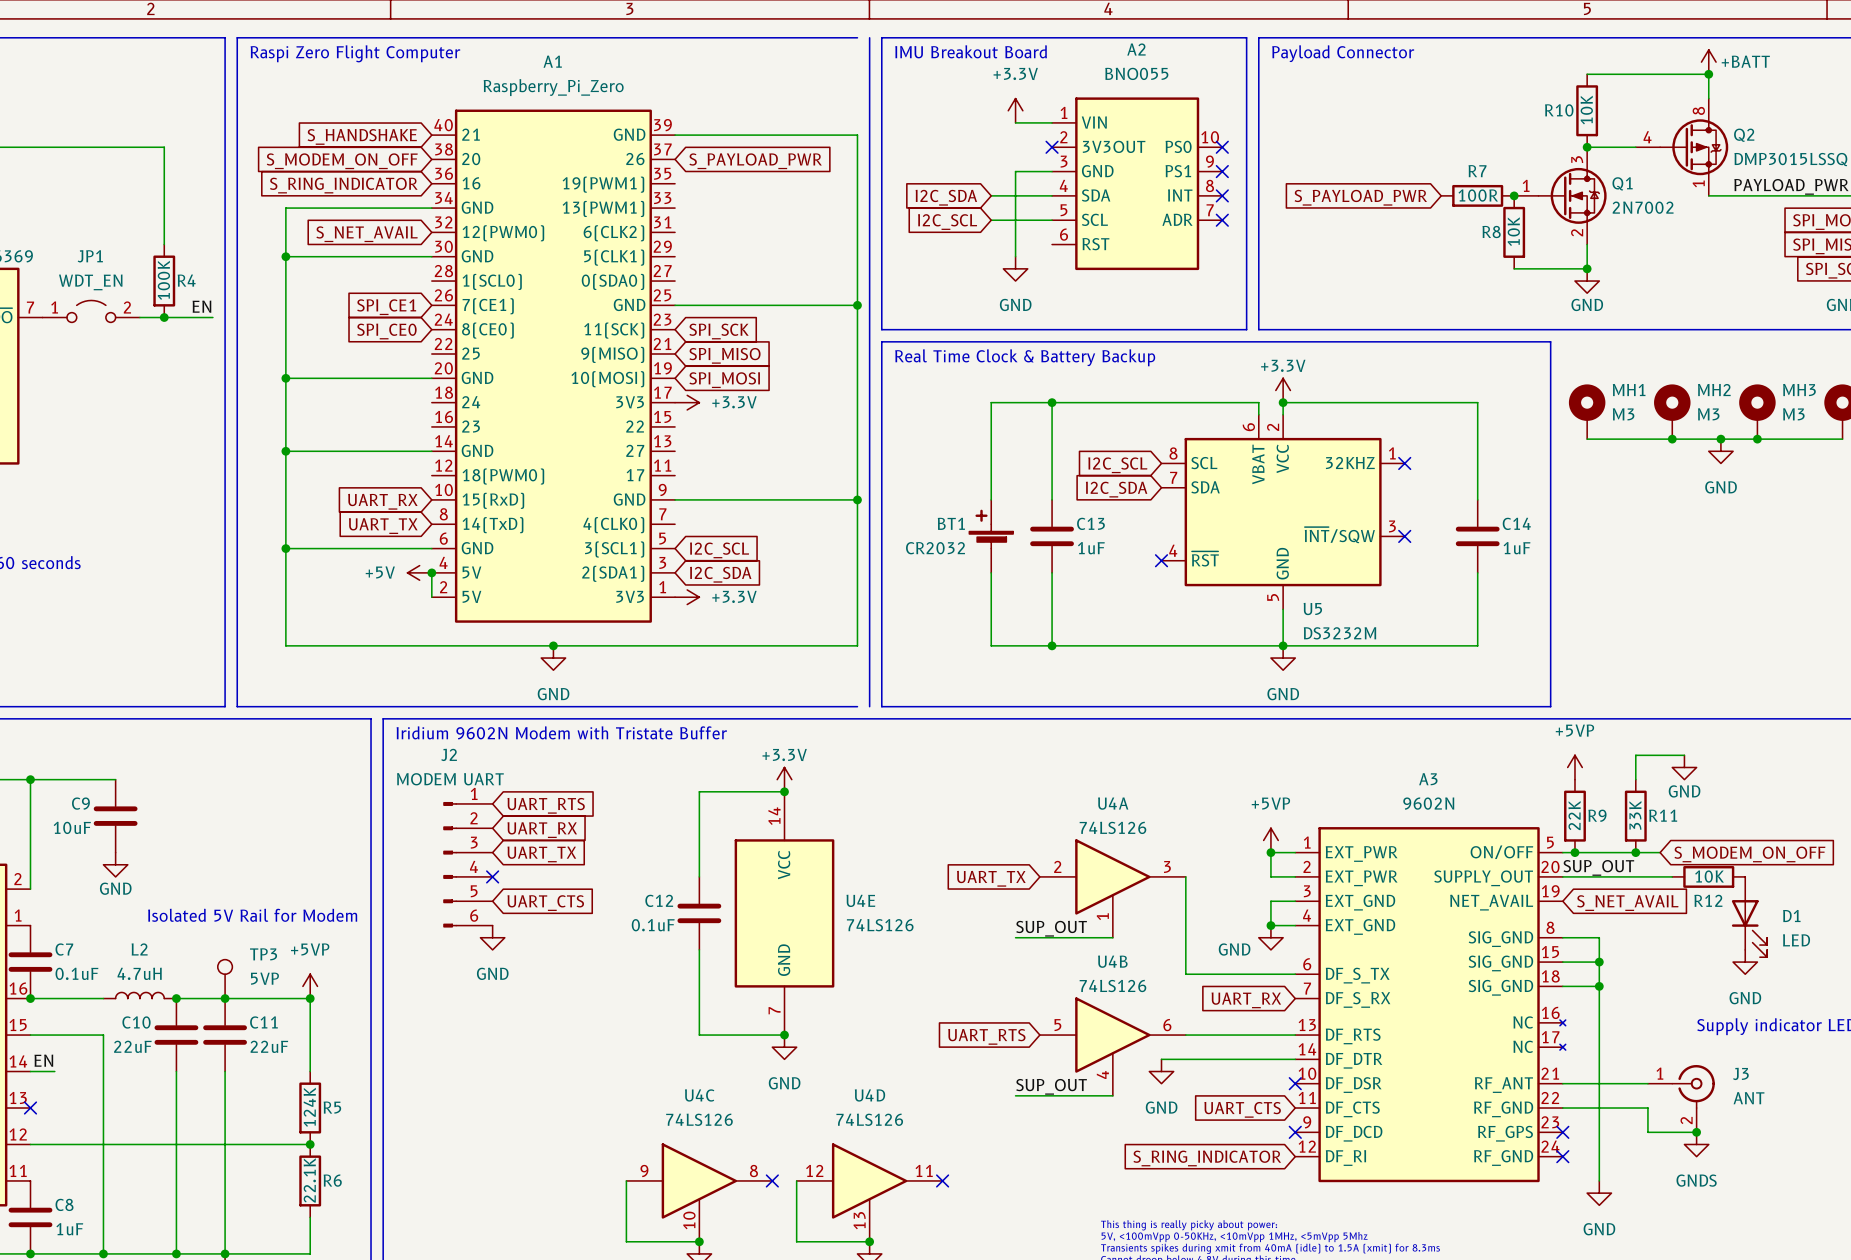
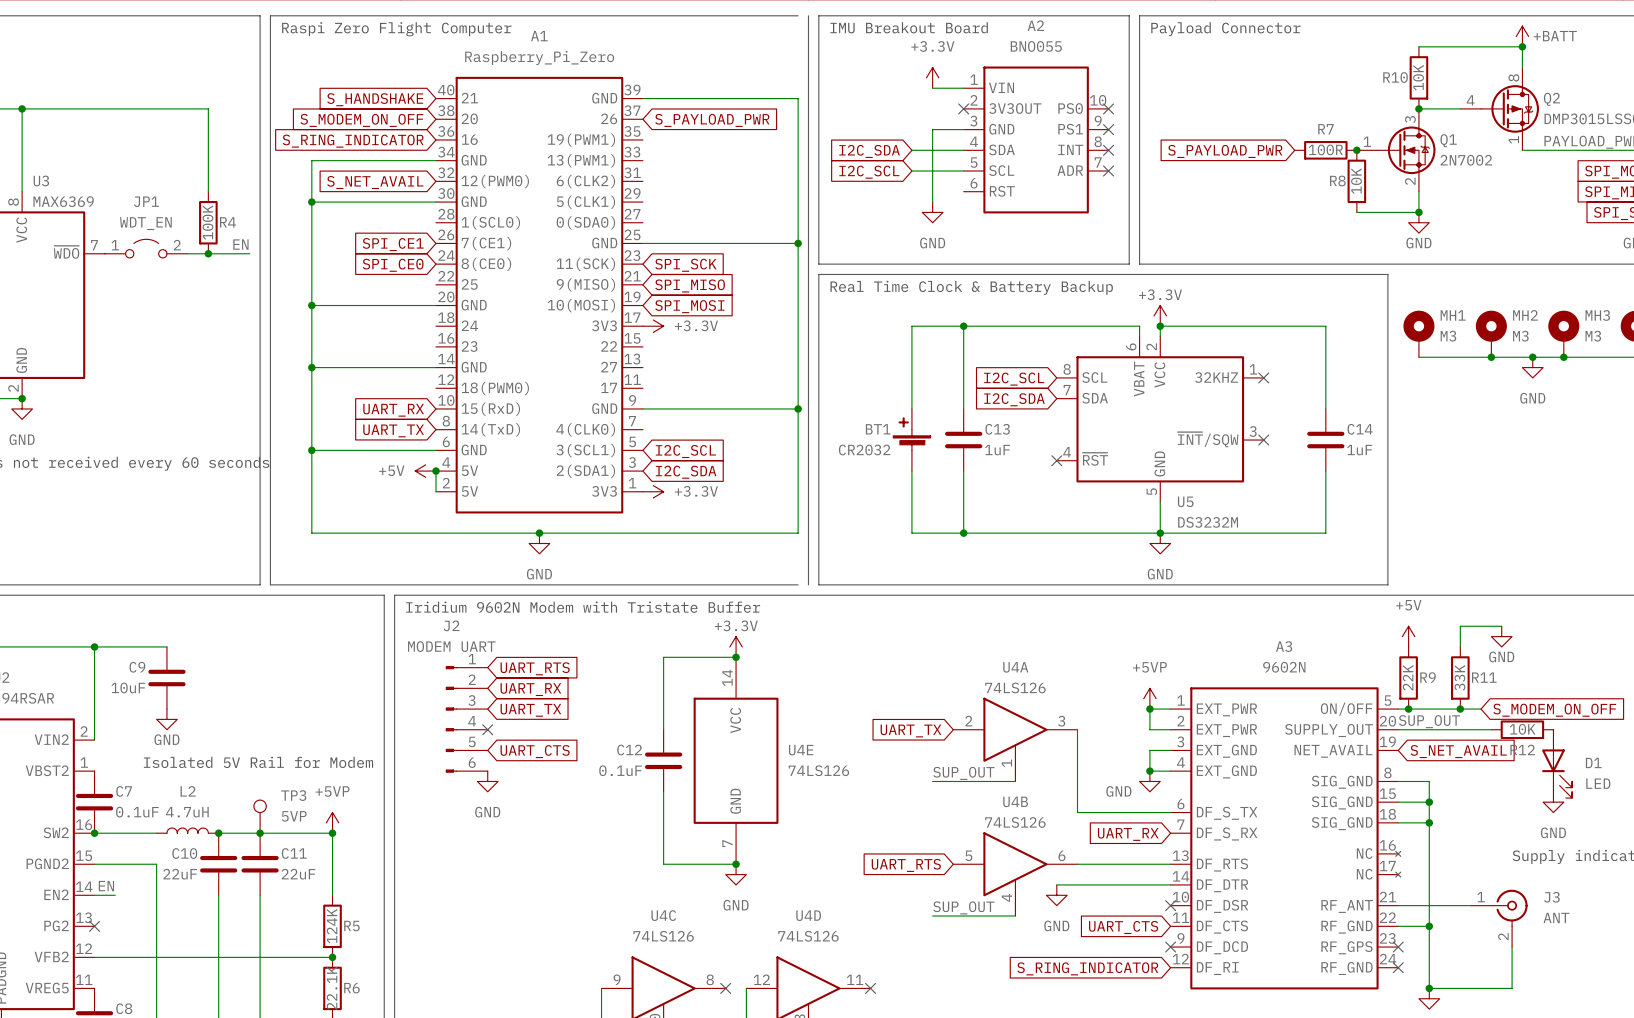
power symbol: +5VP (1574, 767) -> +5V (1408, 636)
wire: (1599, 1108) (1647, 1108) (1647, 1132) (1696, 1132) -> (1429, 988) (1512, 988) (1512, 947)
junction: none -> (1429, 926)
junction: (1696, 1132) -> none
power symbol: GNDS (1696, 1144) -> none
junction: none -> (1429, 988)

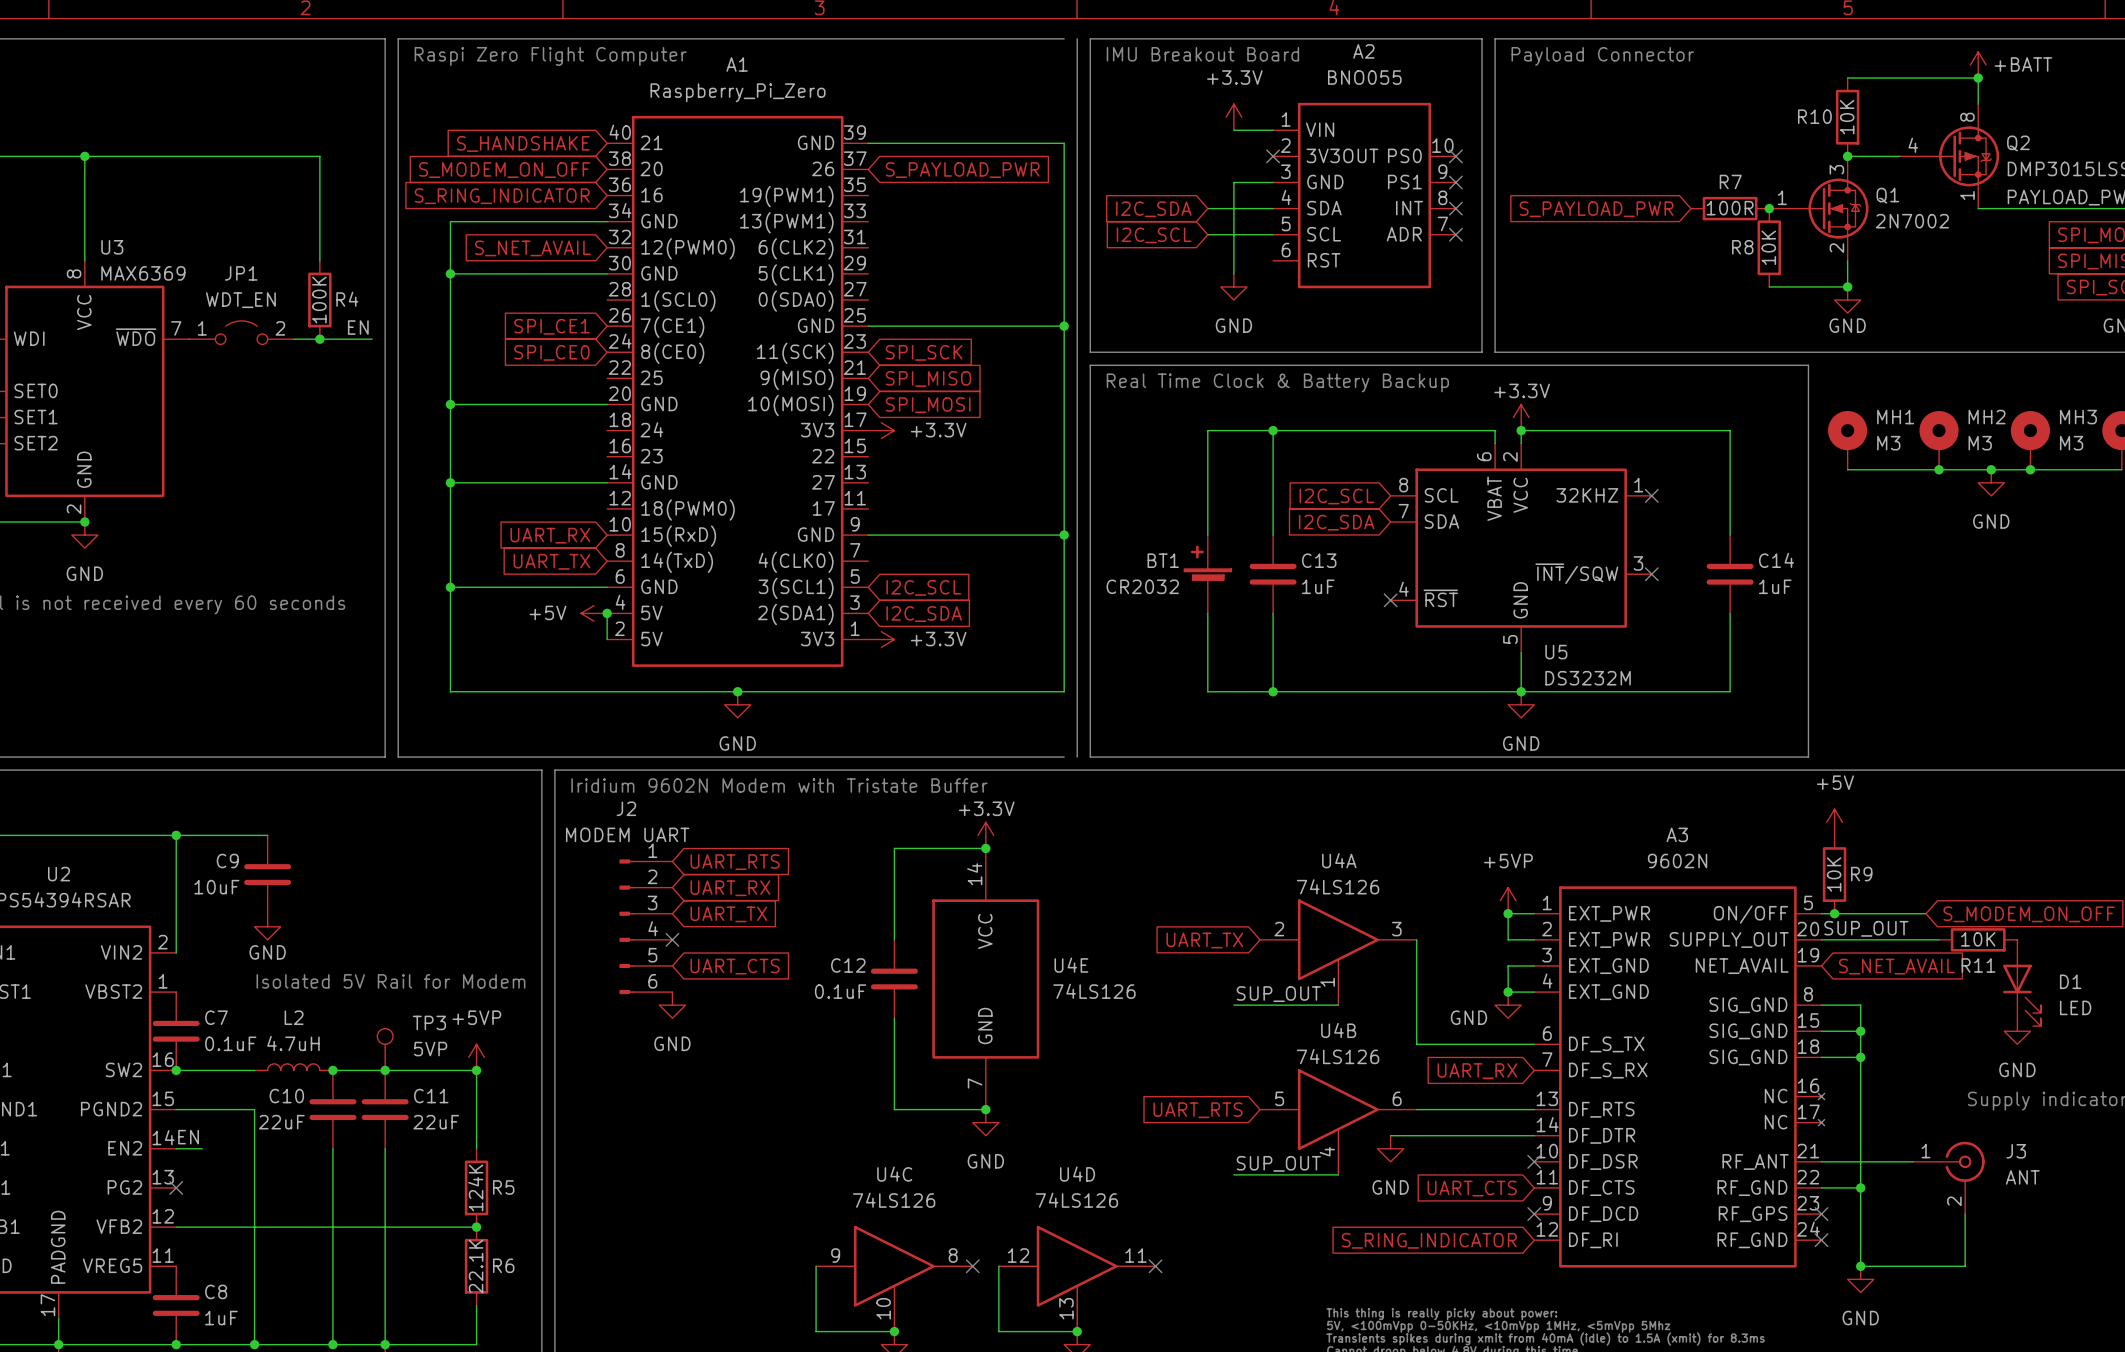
wire: (1501, 626) (1460, 626) (1460, 646) -> none
power symbol: GND (1501, 636) -> none
R9 value: 22K (1408, 677) -> 10K (1834, 874)
R11: 33K (1460, 678) -> none
junction: (1460, 709) -> none
R12 name: R12 (1522, 749) -> R11 (1978, 965)

